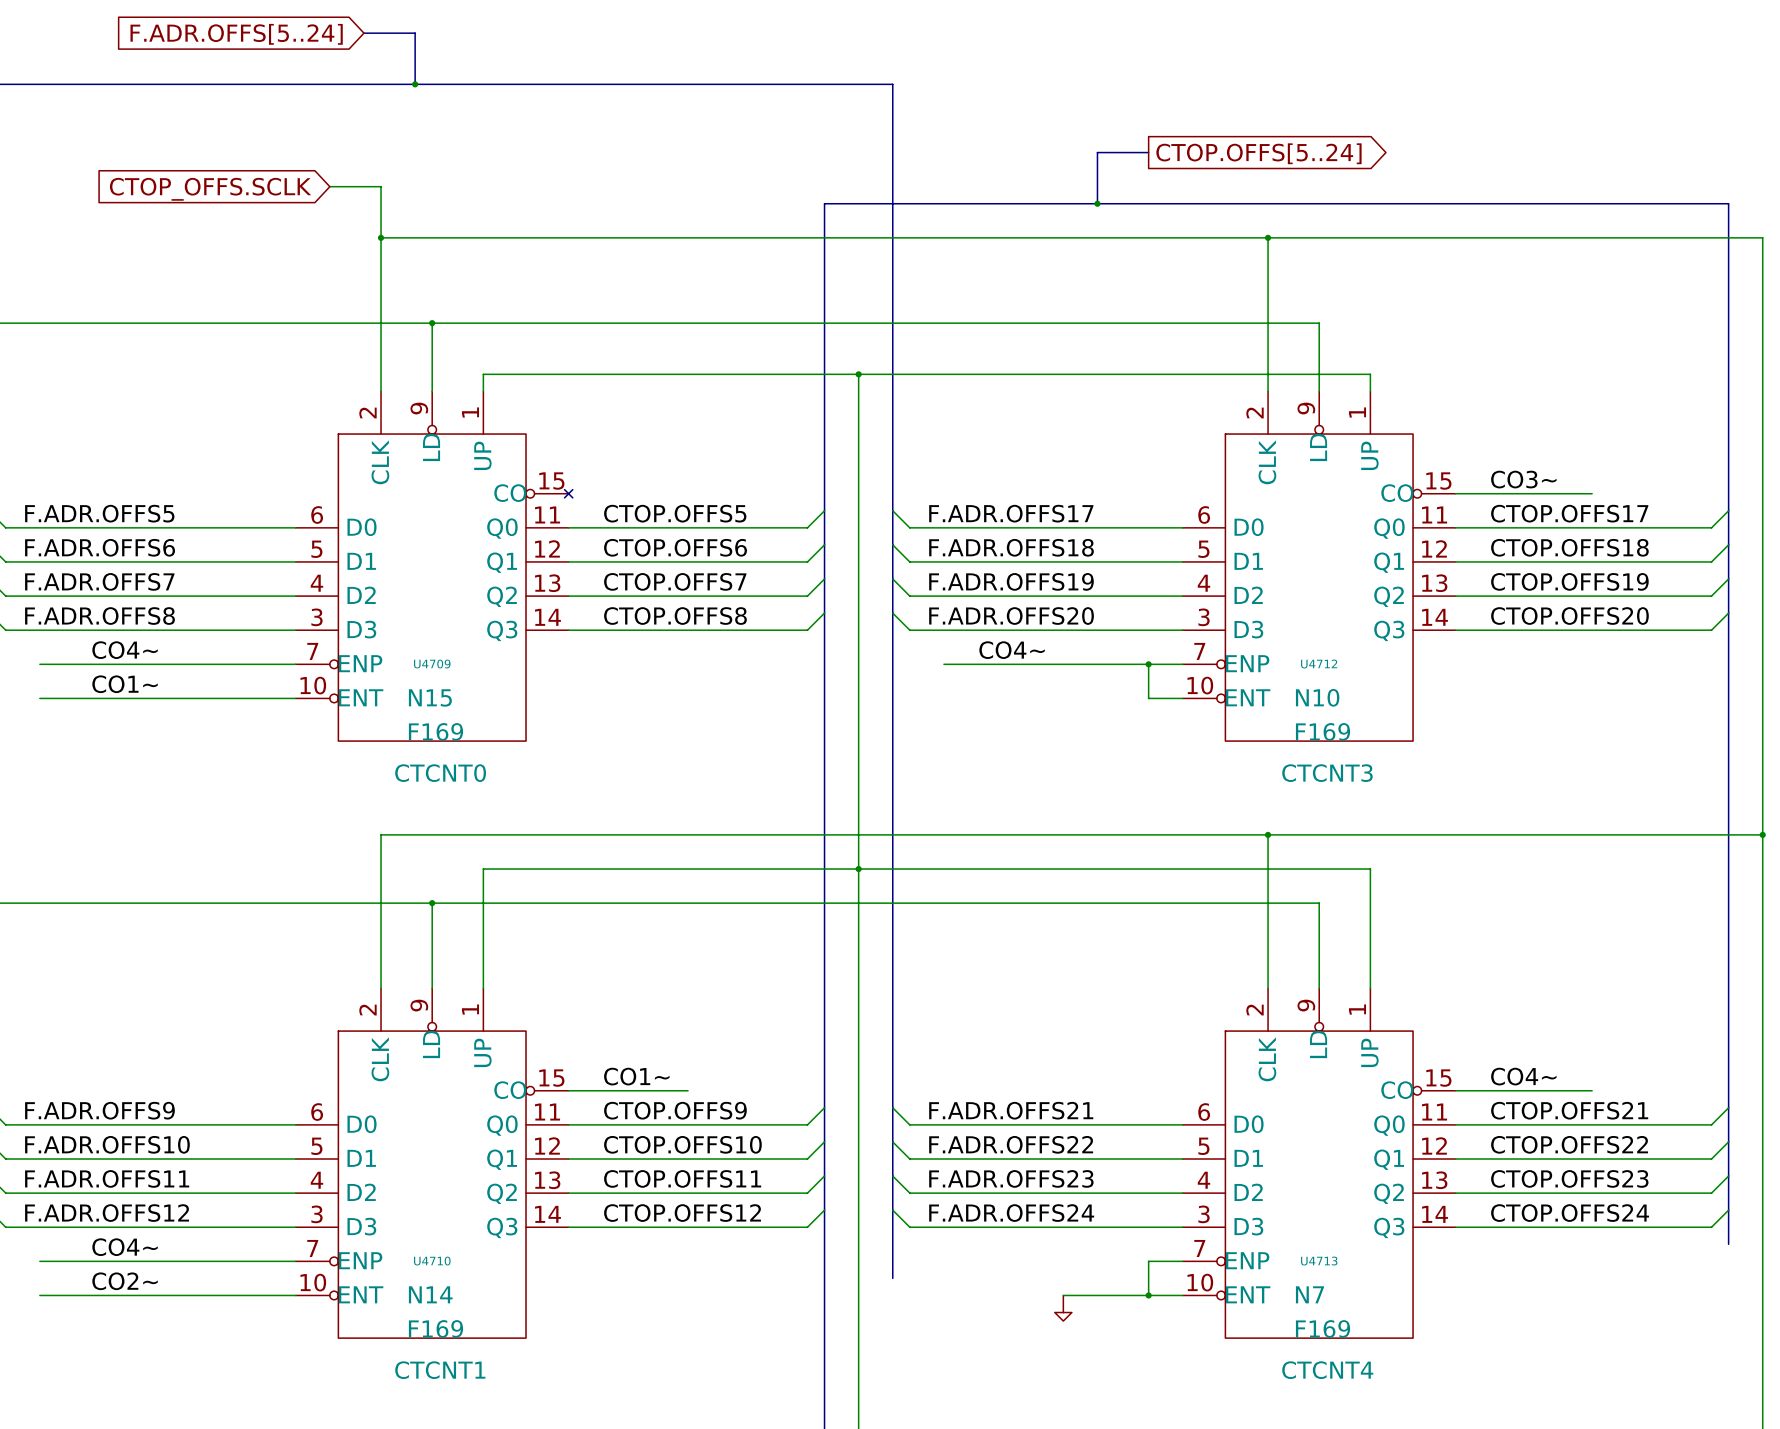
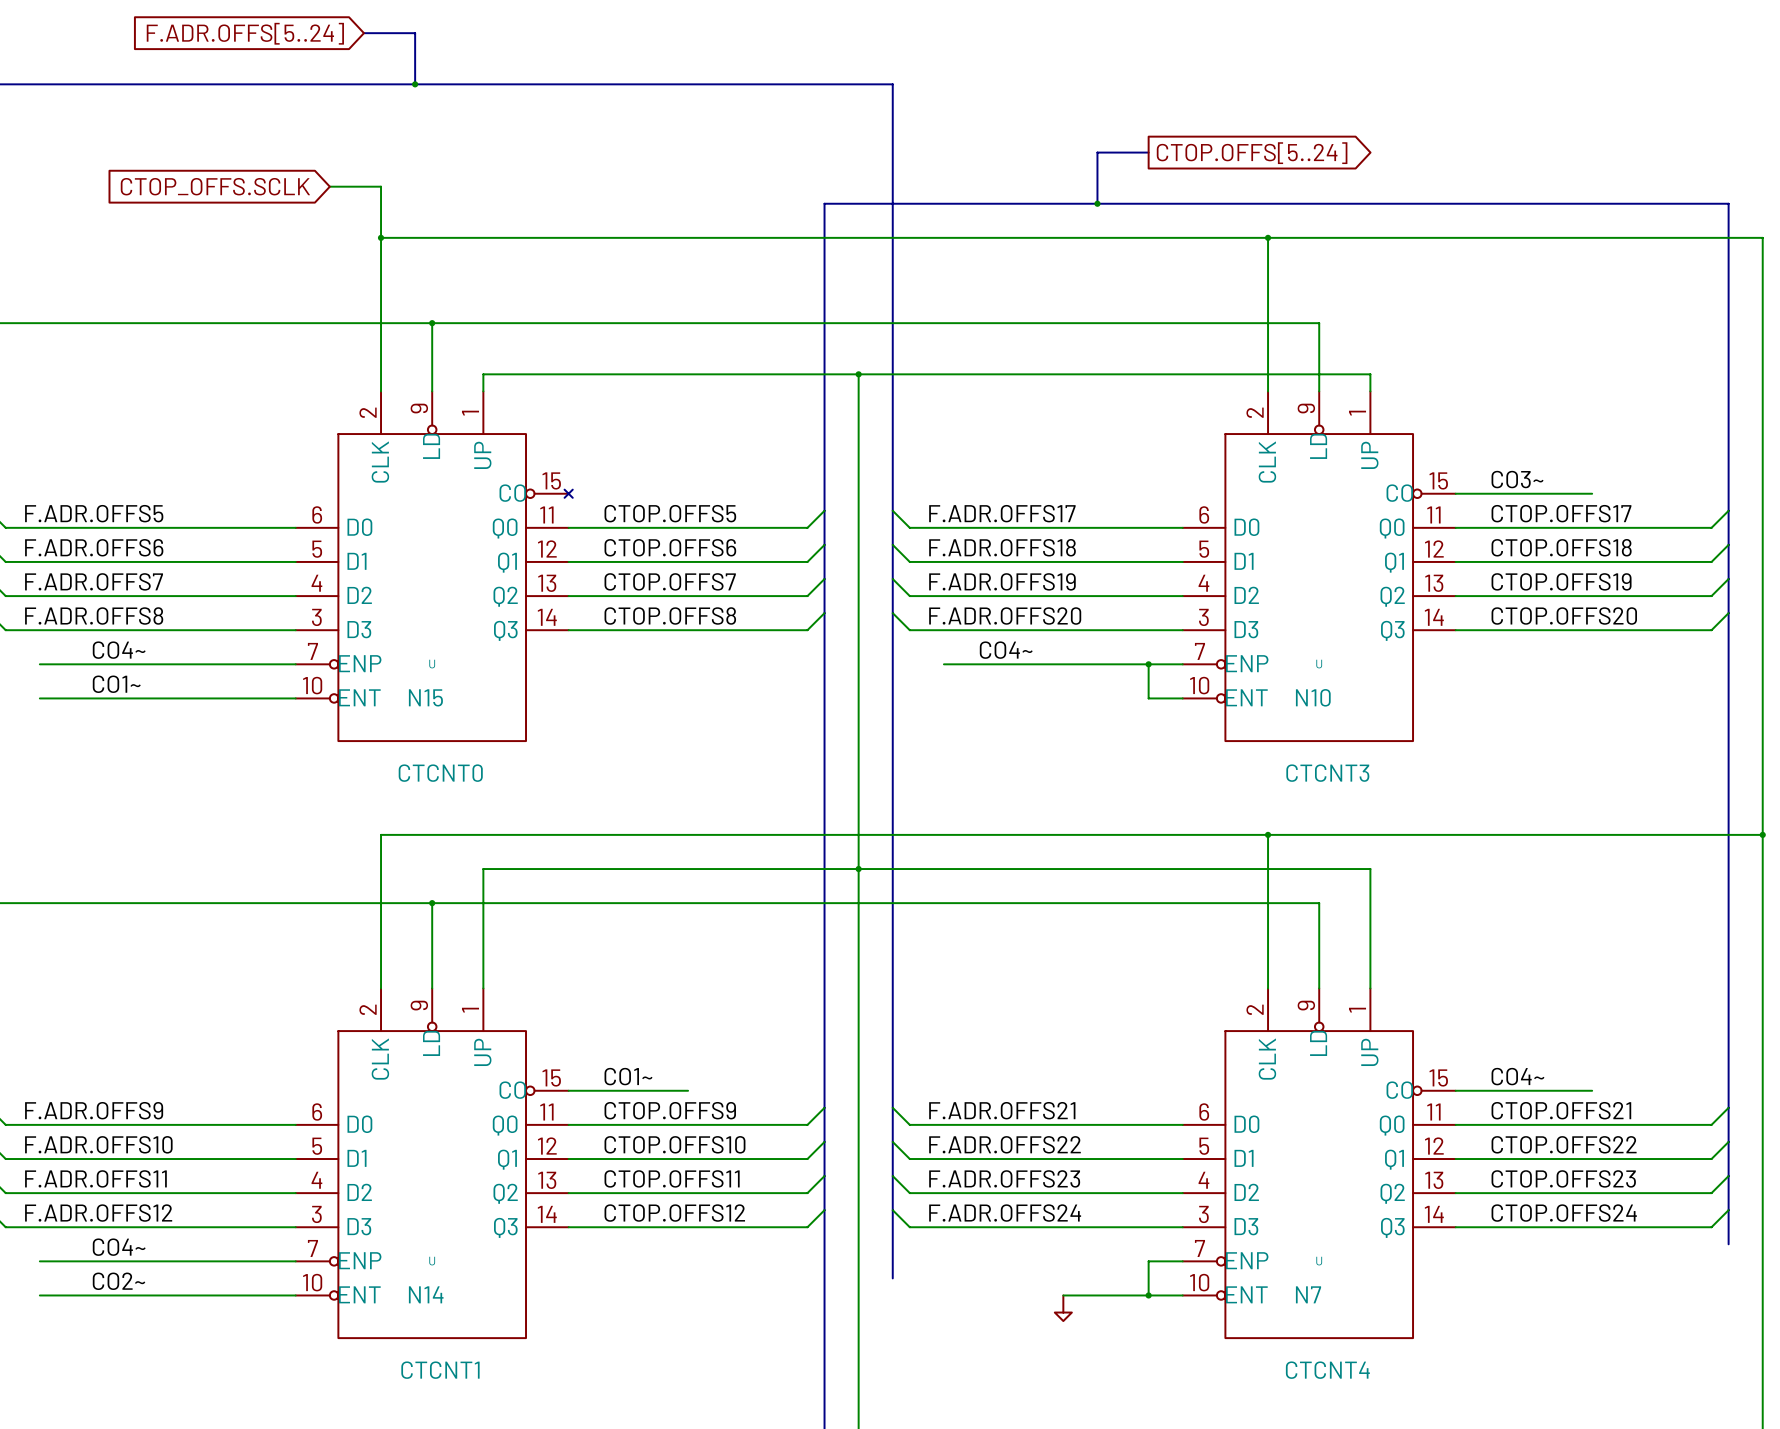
U4709 name: U4709 (432, 664) -> U (432, 664)
U4712 name: U4712 (1319, 664) -> U (1319, 664)
U4709 value: F169 (435, 731) -> none
U4712 value: F169 (1323, 731) -> none
U4710 name: U4710 (432, 1261) -> U (432, 1261)
U4713 name: U4713 (1319, 1261) -> U (1319, 1261)
U4710 value: F169 (435, 1328) -> none
U4713 value: F169 (1323, 1328) -> none

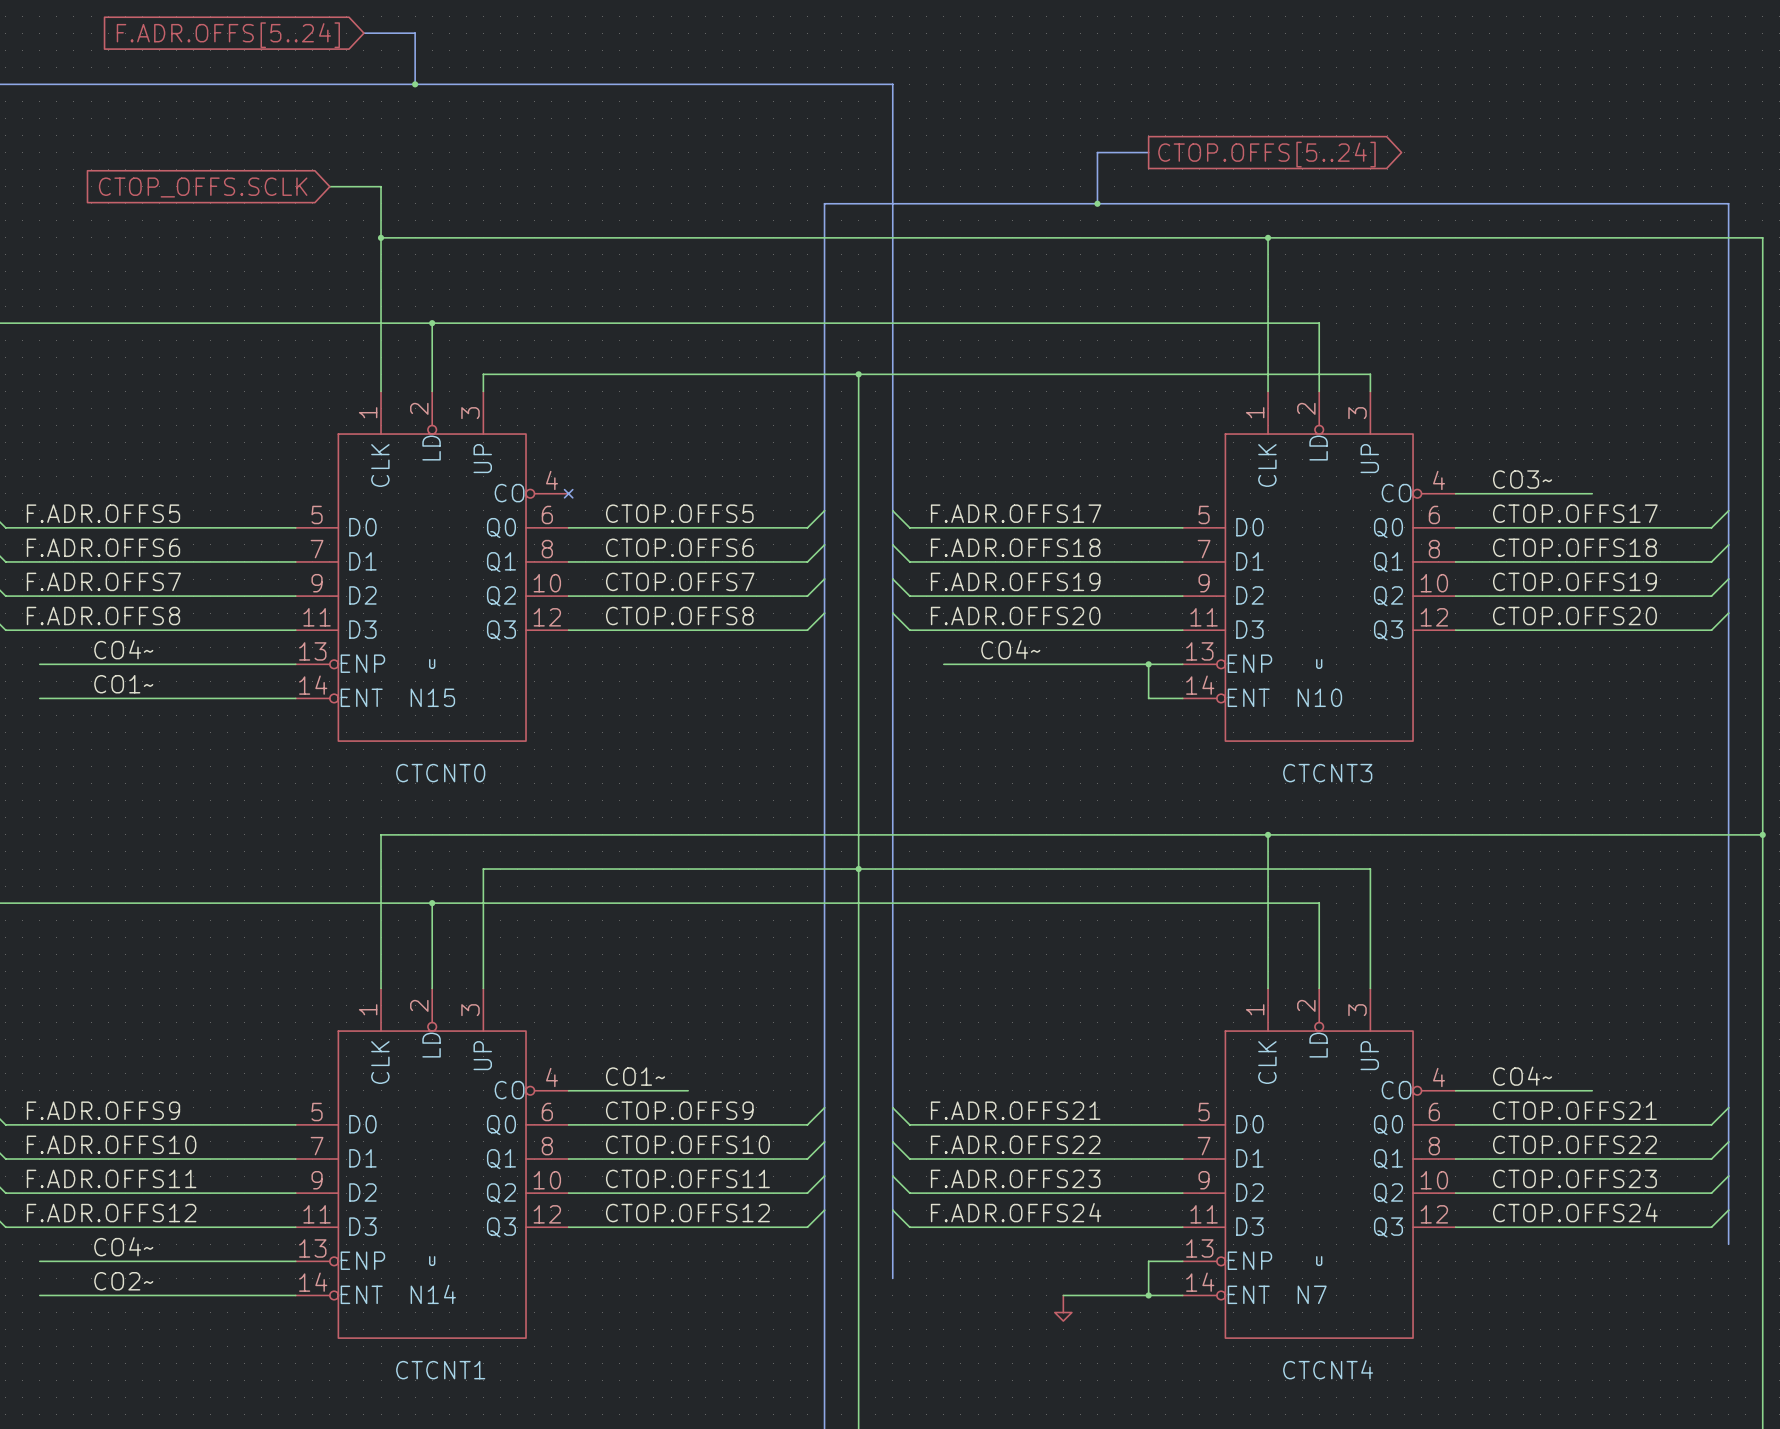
U symbol: [295, 391, 569, 742] -> [295, 391, 569, 742]
U symbol: [1182, 391, 1456, 742] -> [1182, 391, 1456, 742]
U symbol: [295, 988, 569, 1339] -> [295, 988, 569, 1339]
U symbol: [1182, 988, 1456, 1339] -> [1182, 988, 1456, 1339]

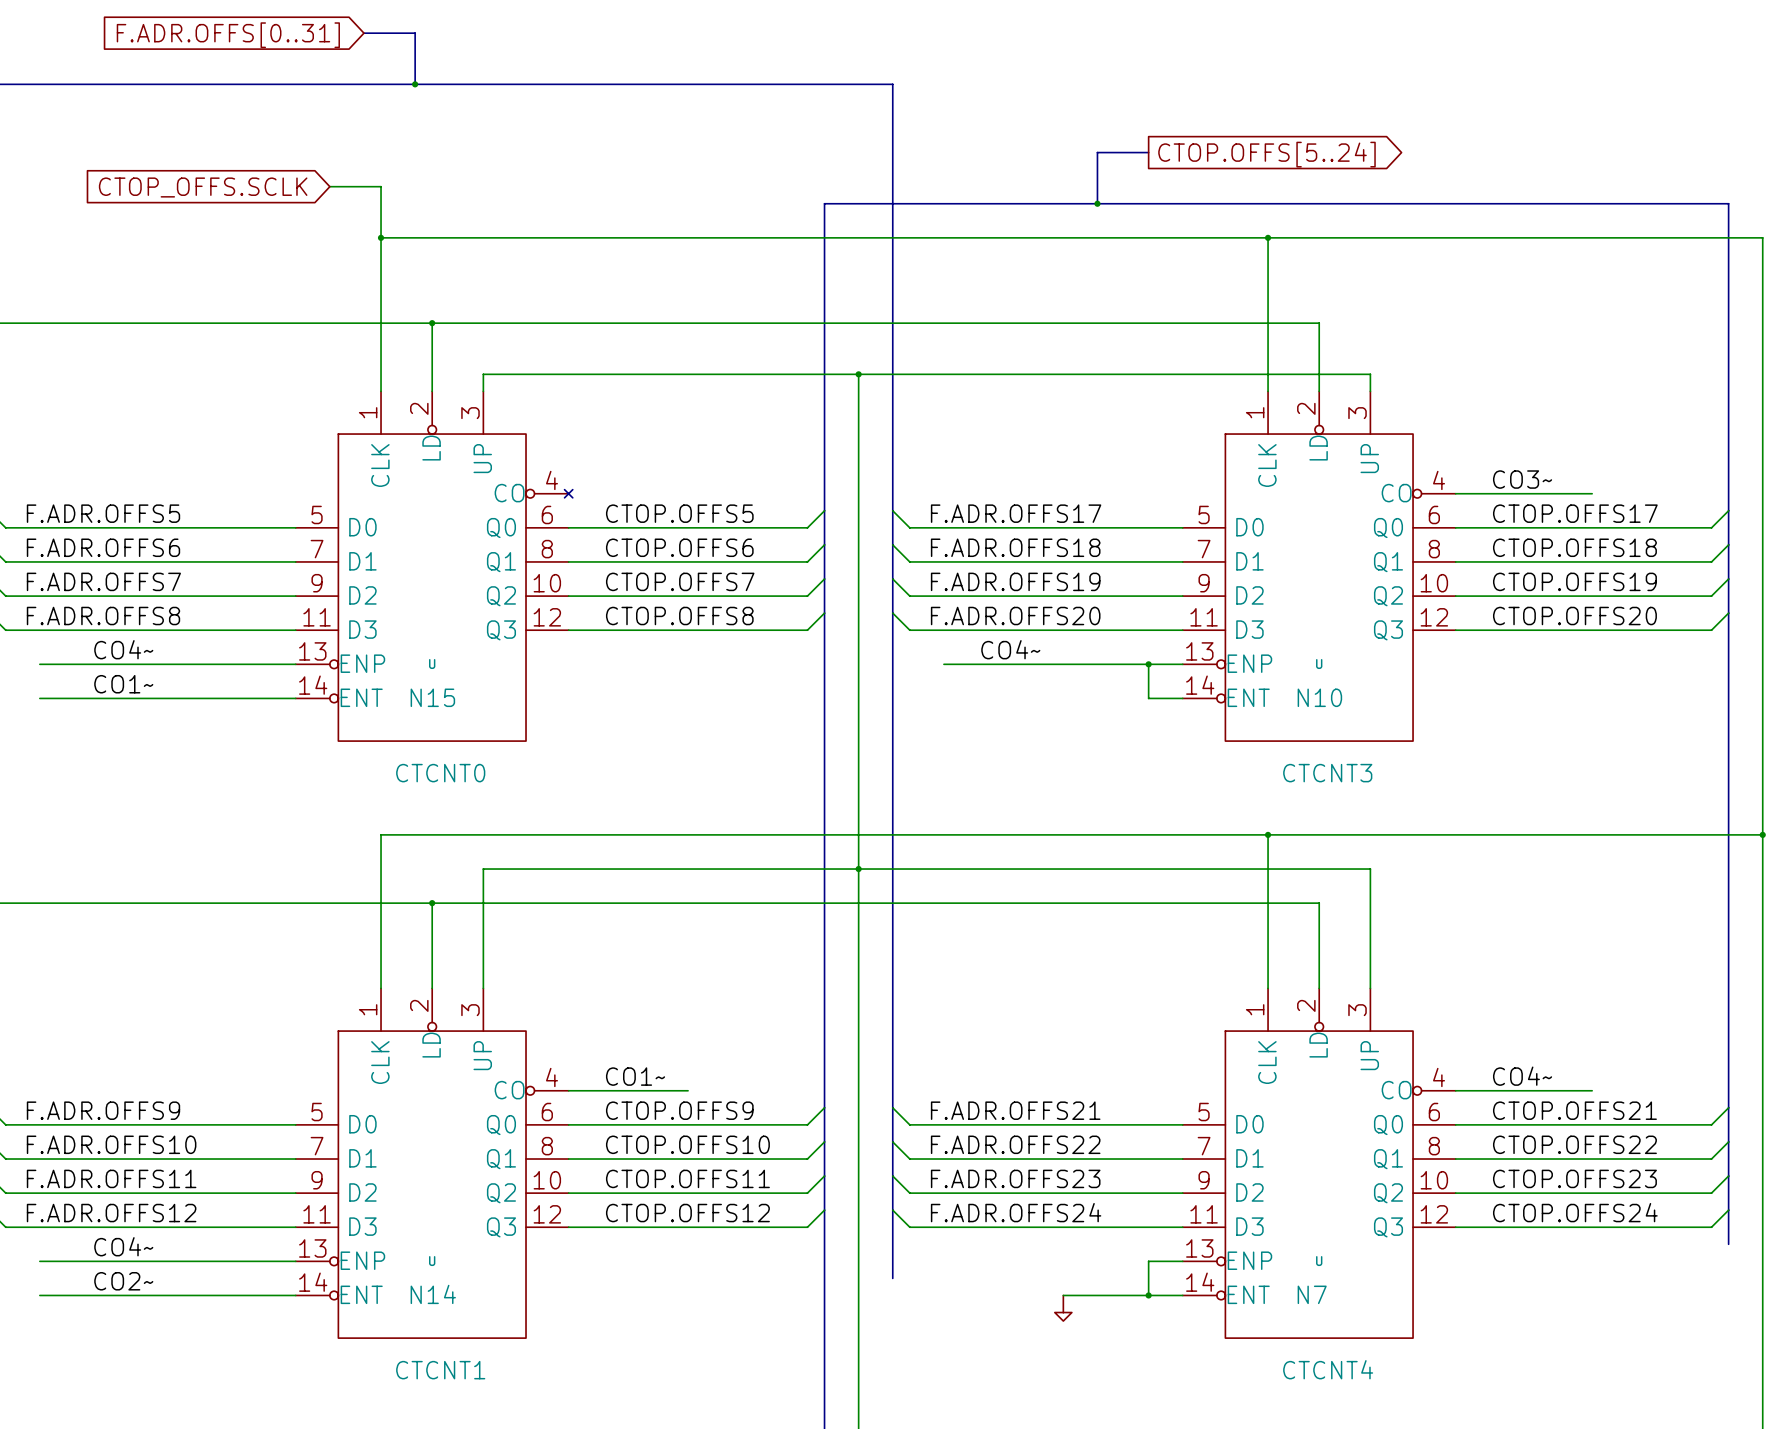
global label: F.ADR.OFFS[5..24] (228, 35) -> F.ADR.OFFS[0..31] (228, 35)

